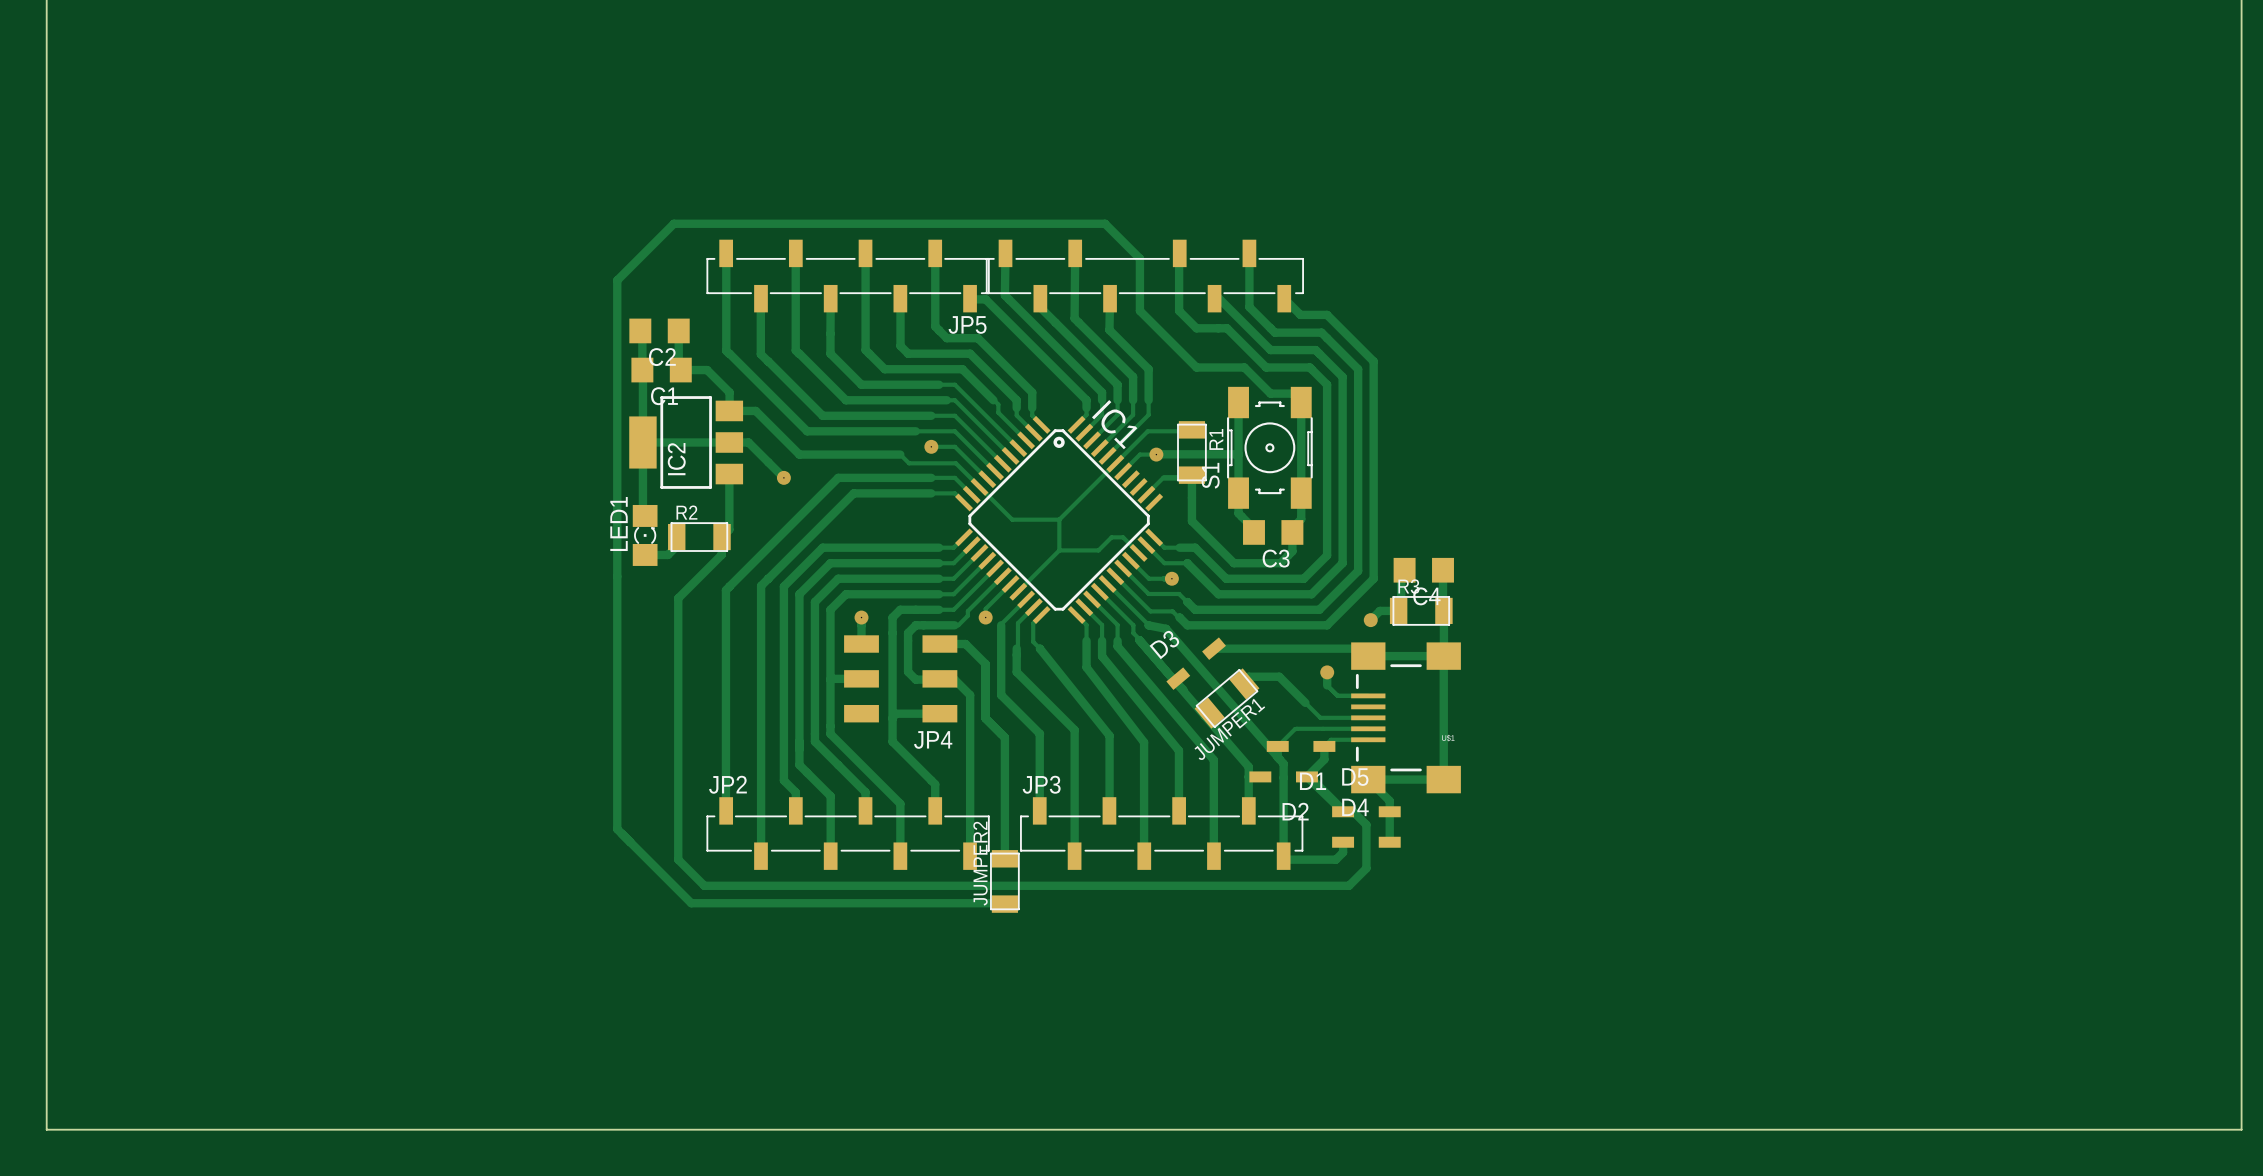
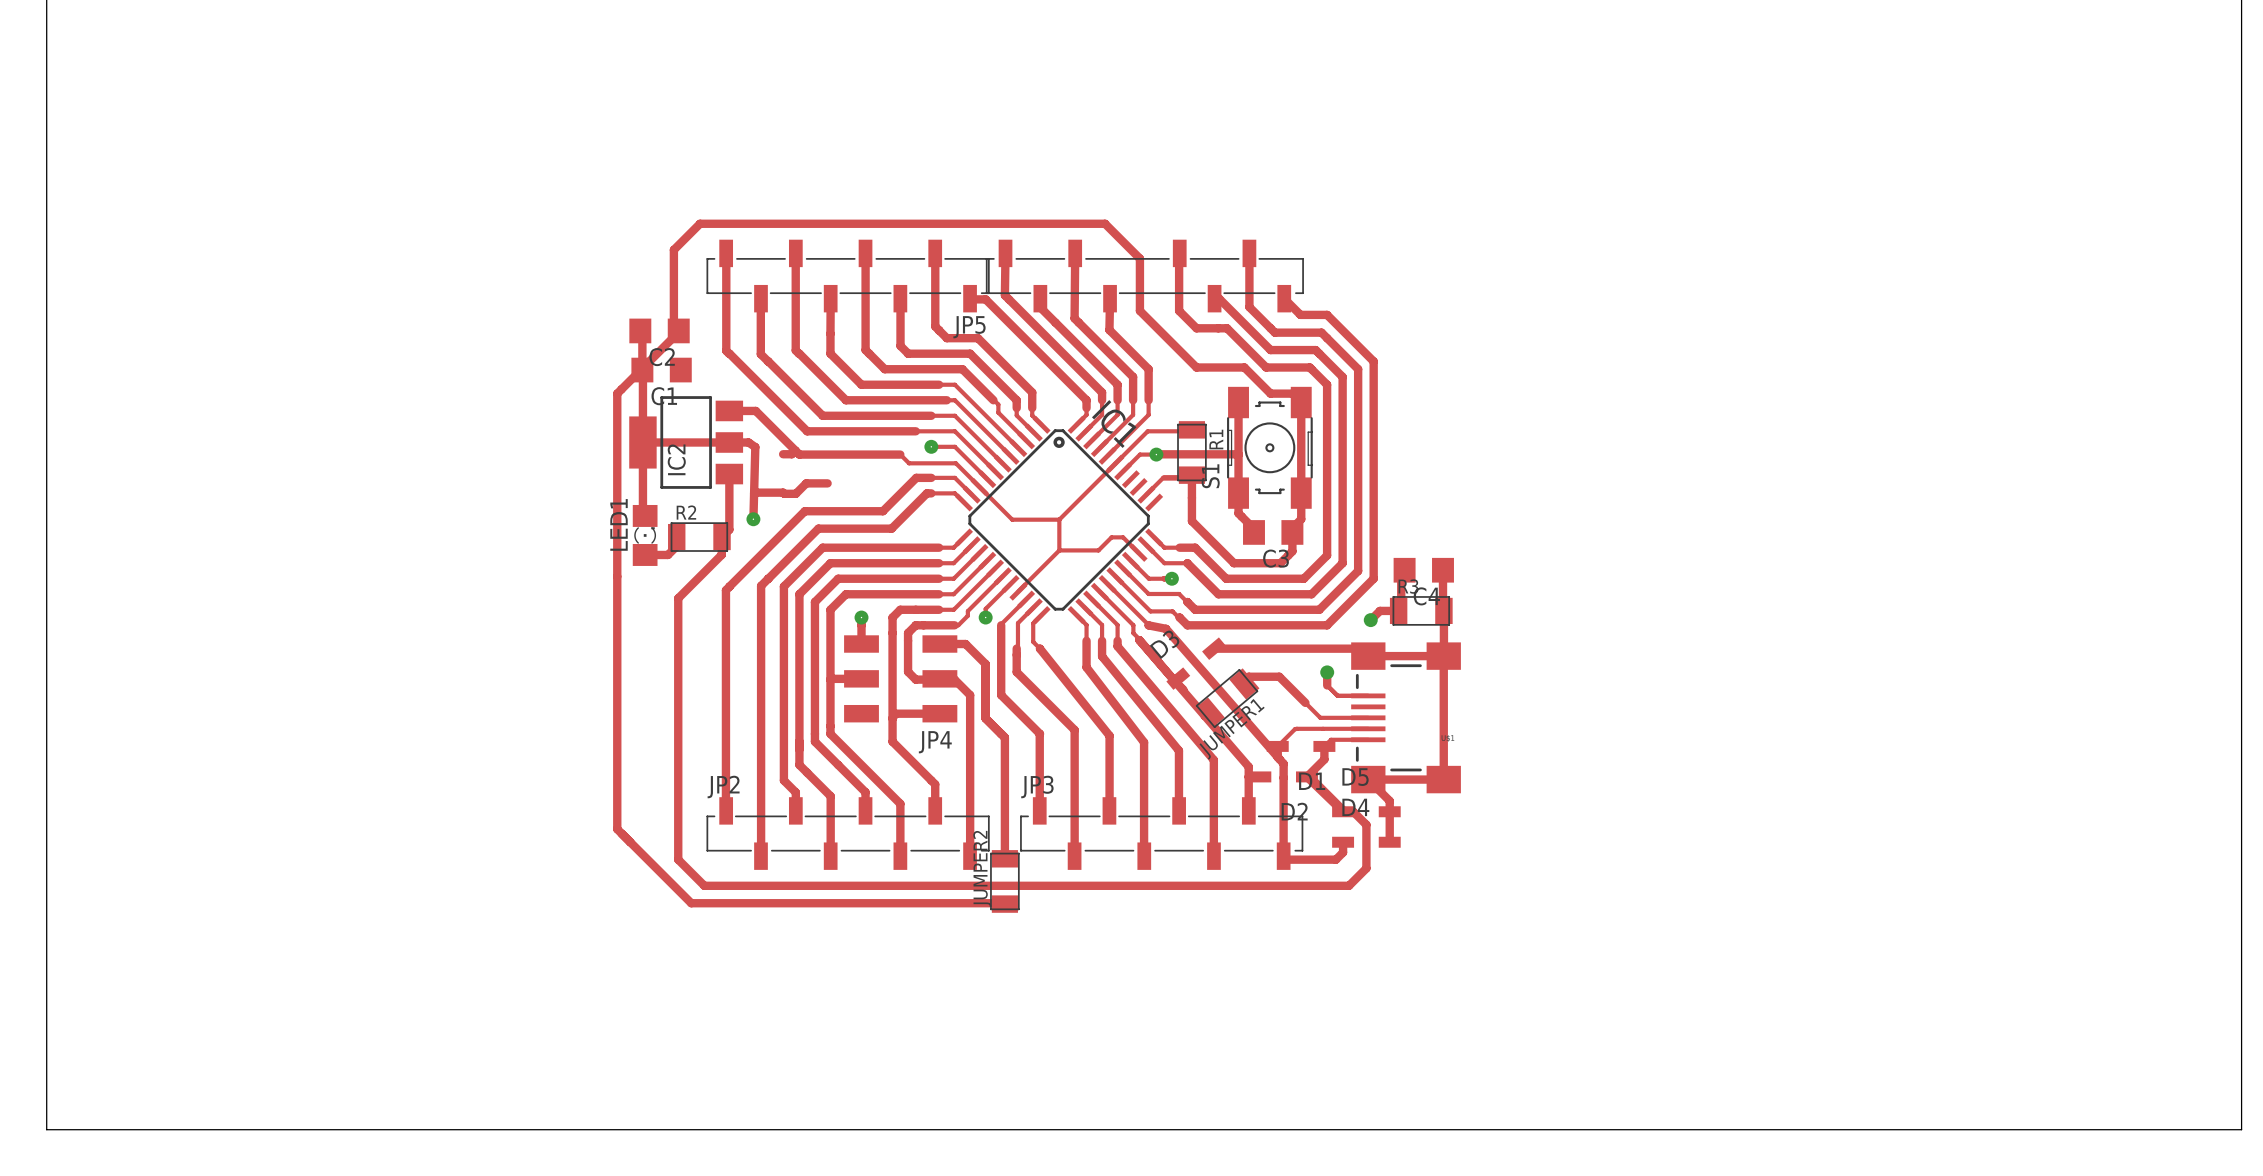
track: (700, 223) (673, 223) (617, 280) (617, 393) -> (700, 223) (673, 249) (673, 337) (617, 393)
track: (678, 330) (678, 367) (680, 370) (707, 370) (729, 392) (729, 410) -> none
track: (748, 442) (783, 477) -> (748, 442) (755, 447) (753, 519)
track: none -> (795, 450) (791, 454) (783, 454)
via position: (783, 477) -> (753, 519)
track: (916, 477) (838, 477) (804, 511) -> (916, 477) (882, 511) (804, 511)
track: none -> (827, 483) (806, 483) (795, 493) (754, 493)
track: (926, 493) (853, 493) (818, 528) -> (926, 493) (891, 528) (818, 528)

